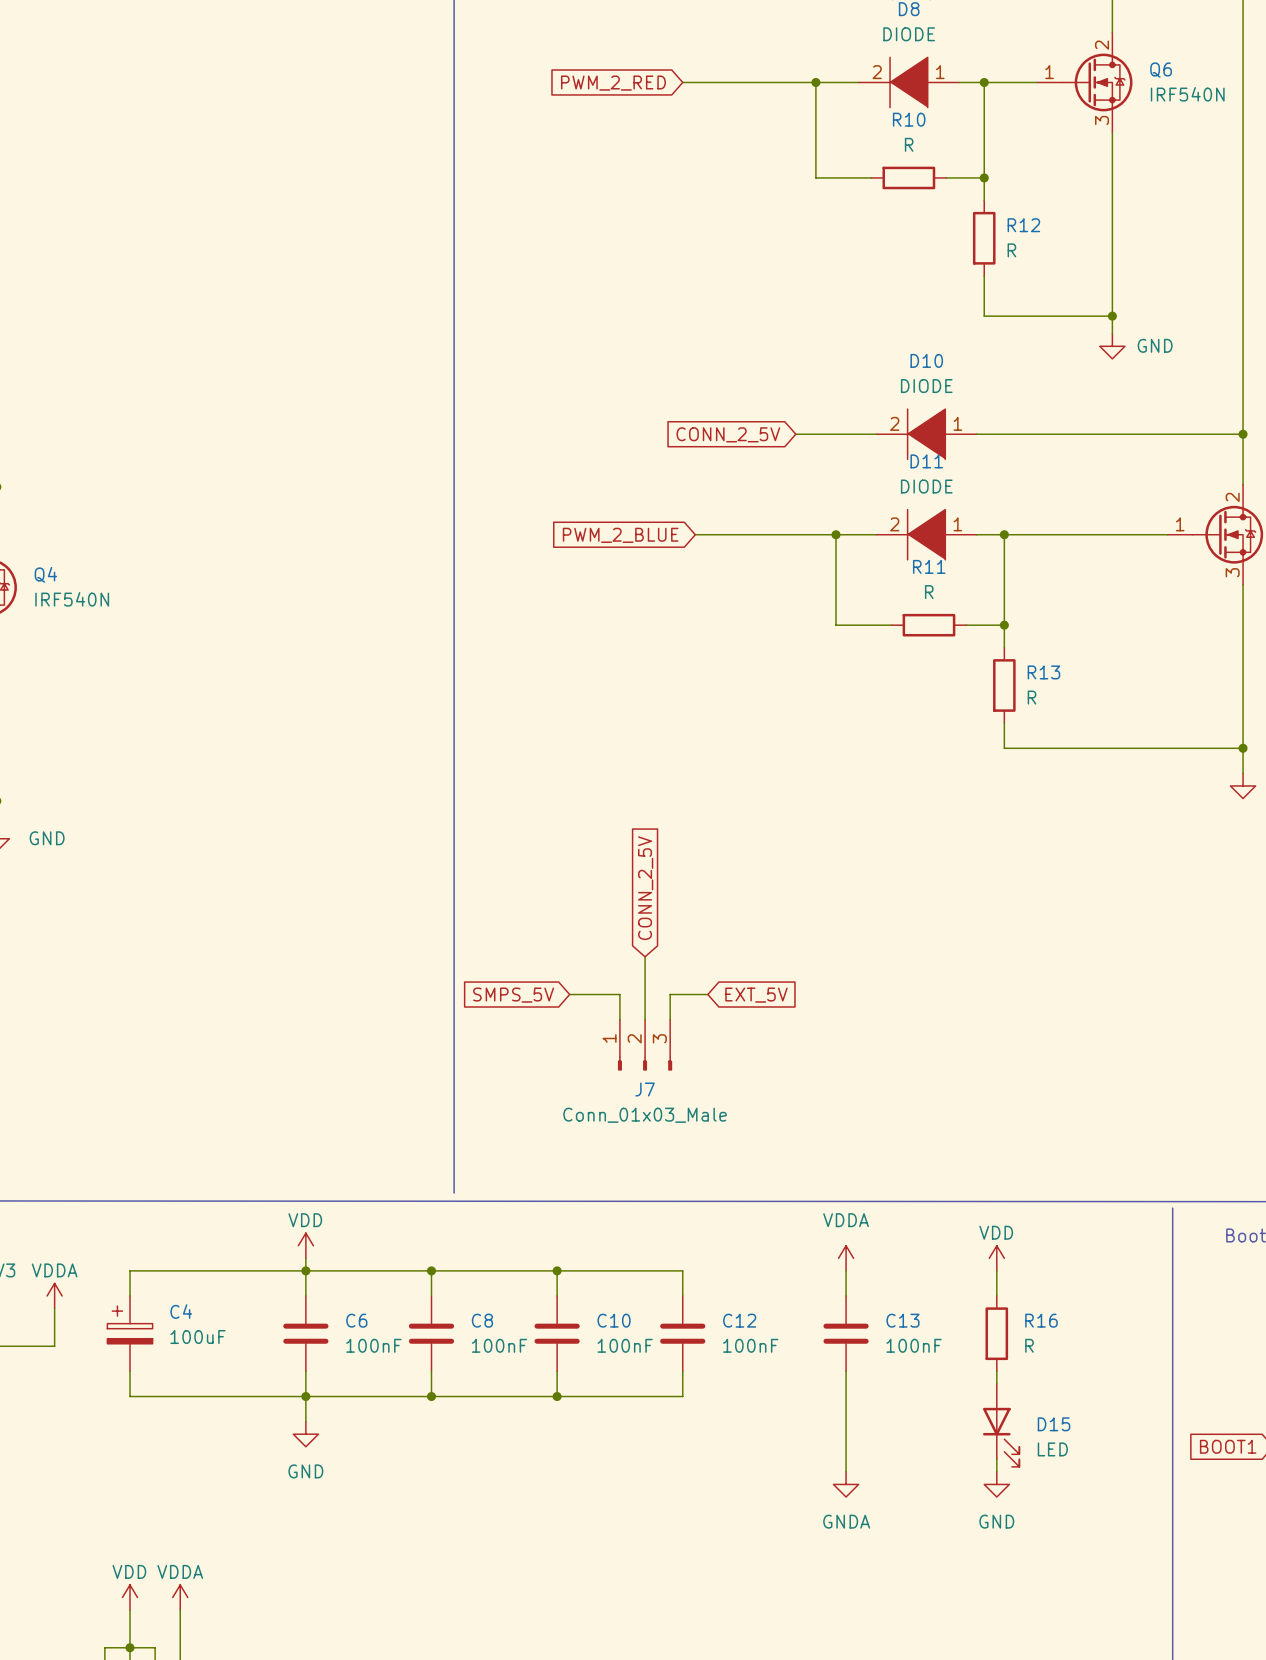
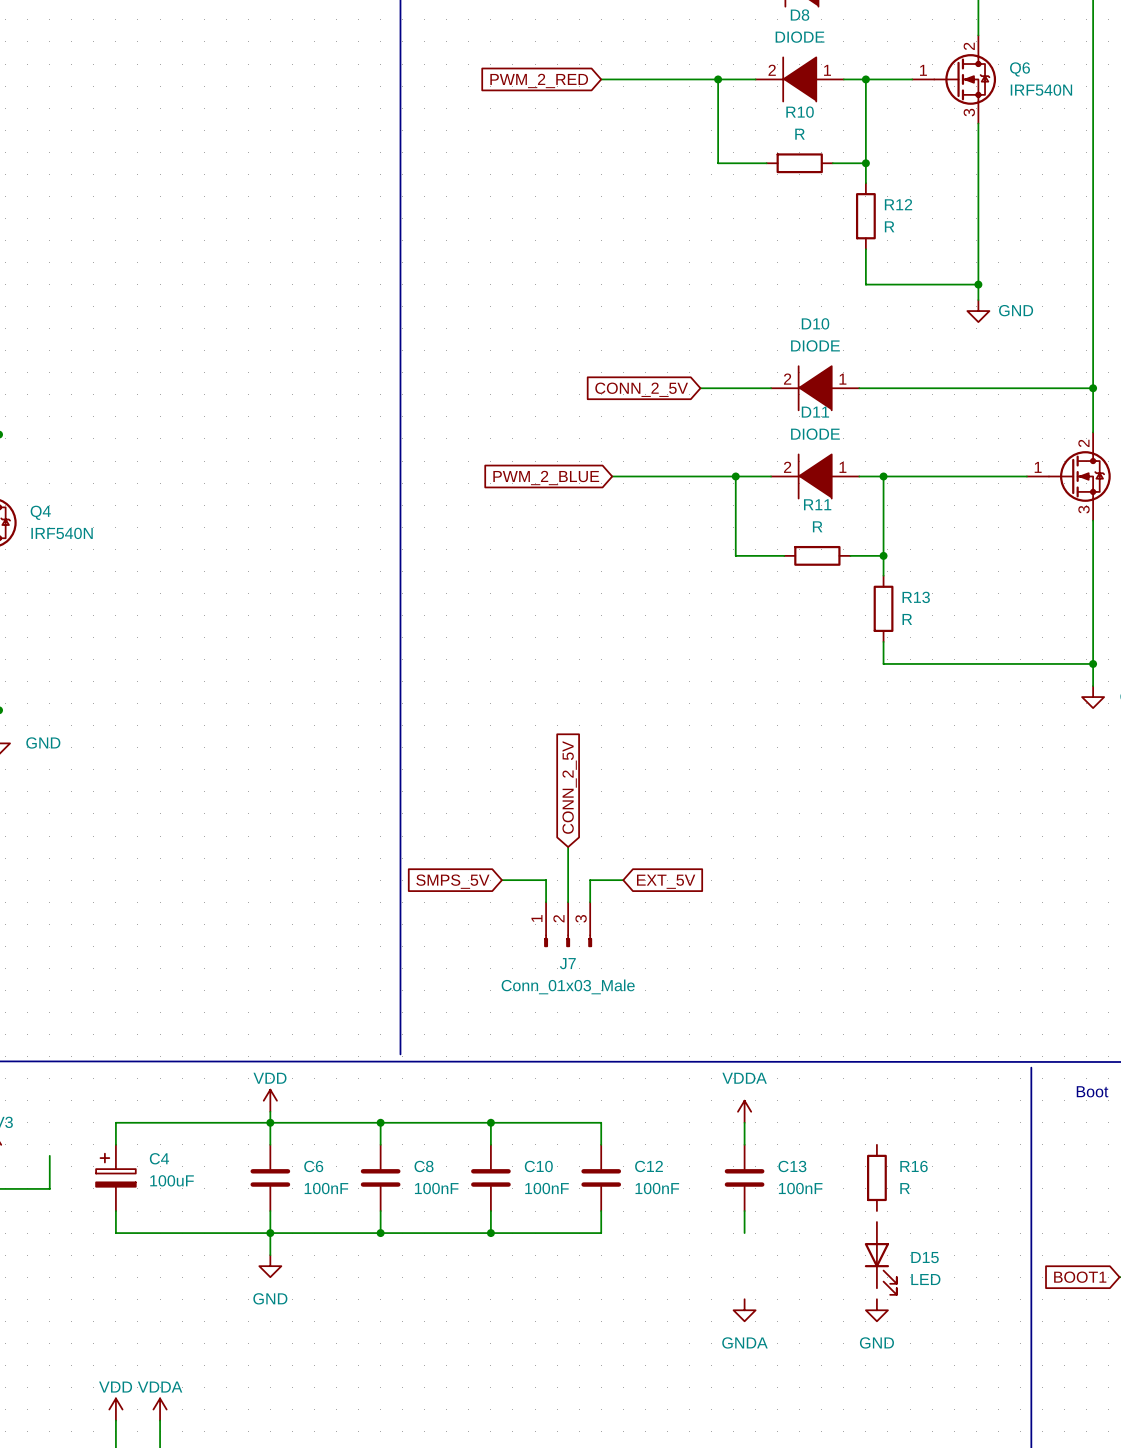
power symbol: VDD (996, 1258) -> none
wire: (996, 1270) (996, 1296) -> none
power symbol: VDDA (54, 1296) -> none
wire: (996, 1371) (996, 1383) -> none
wire: (846, 1396) (846, 1471) -> none
wire: (996, 1459) (996, 1471) -> none

